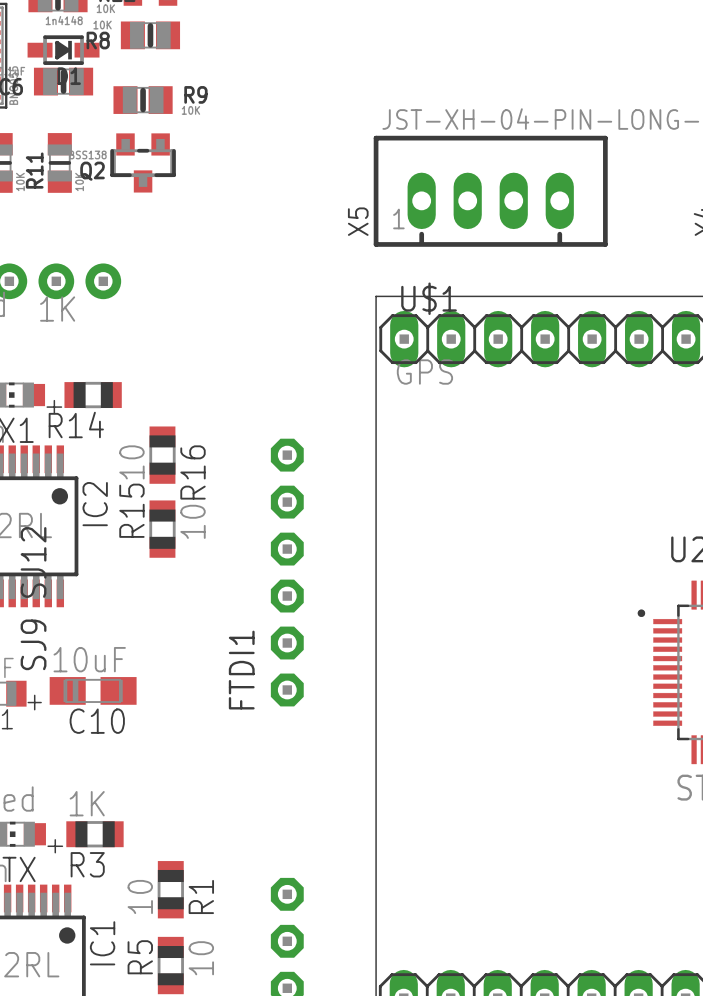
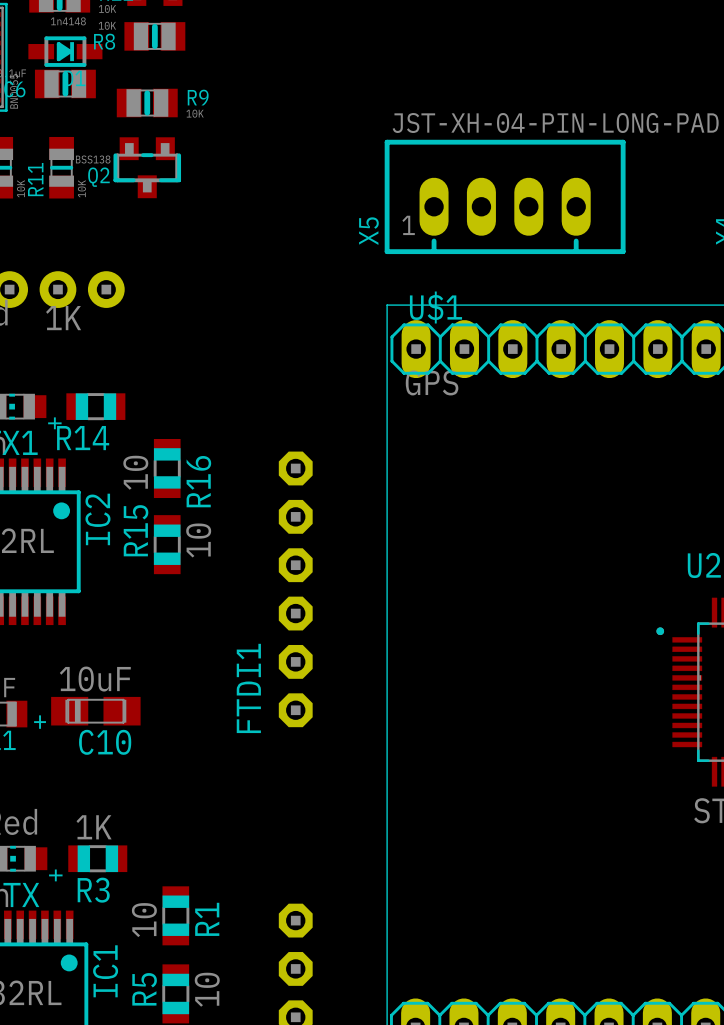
SJ12: (33, 562) -> none
SJ9: (33, 644) -> none

